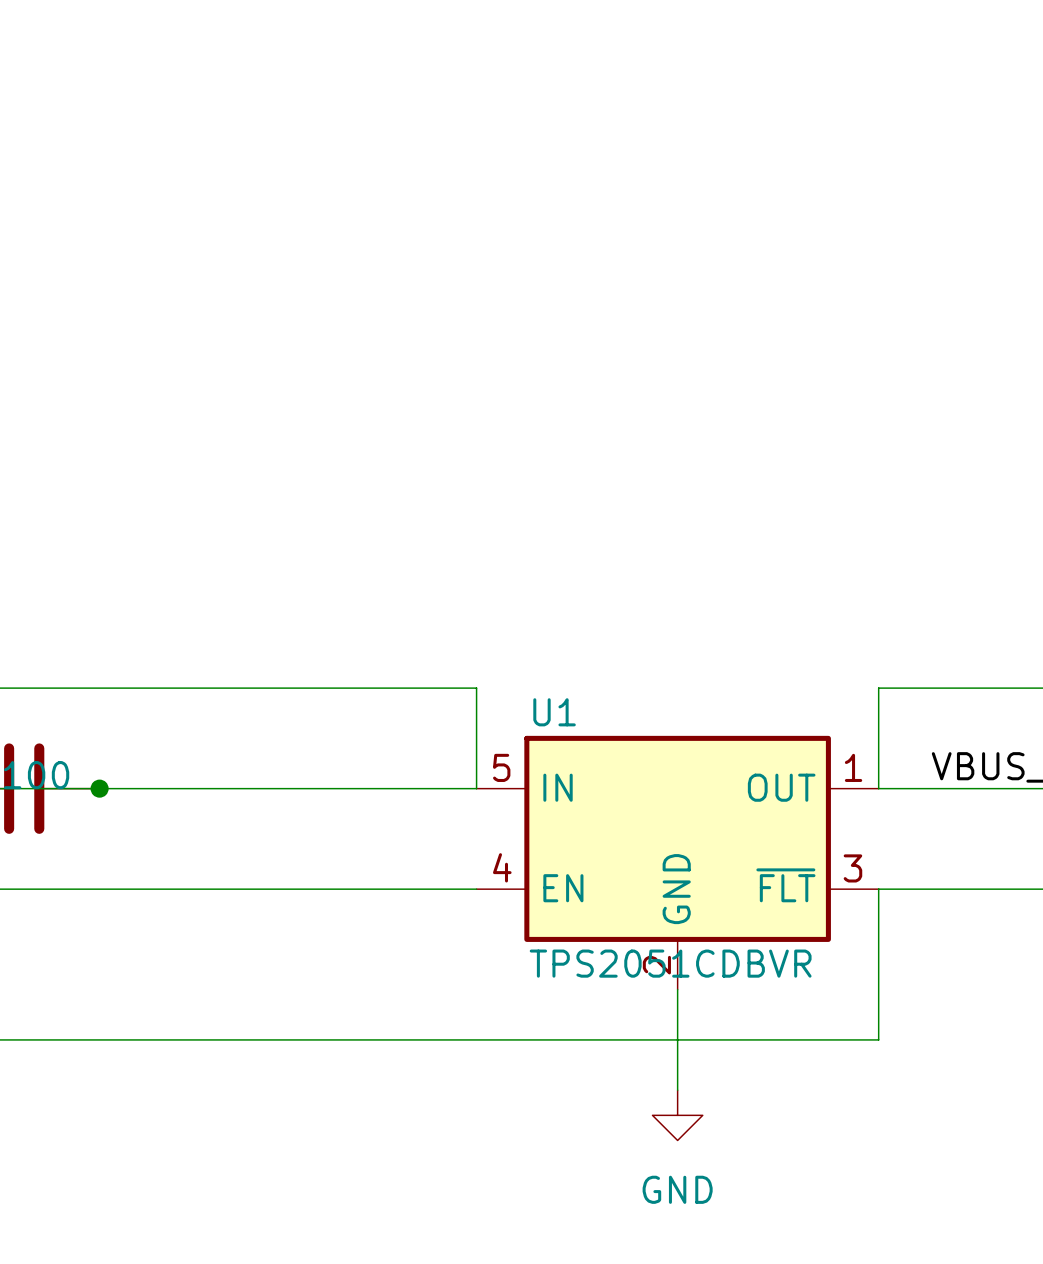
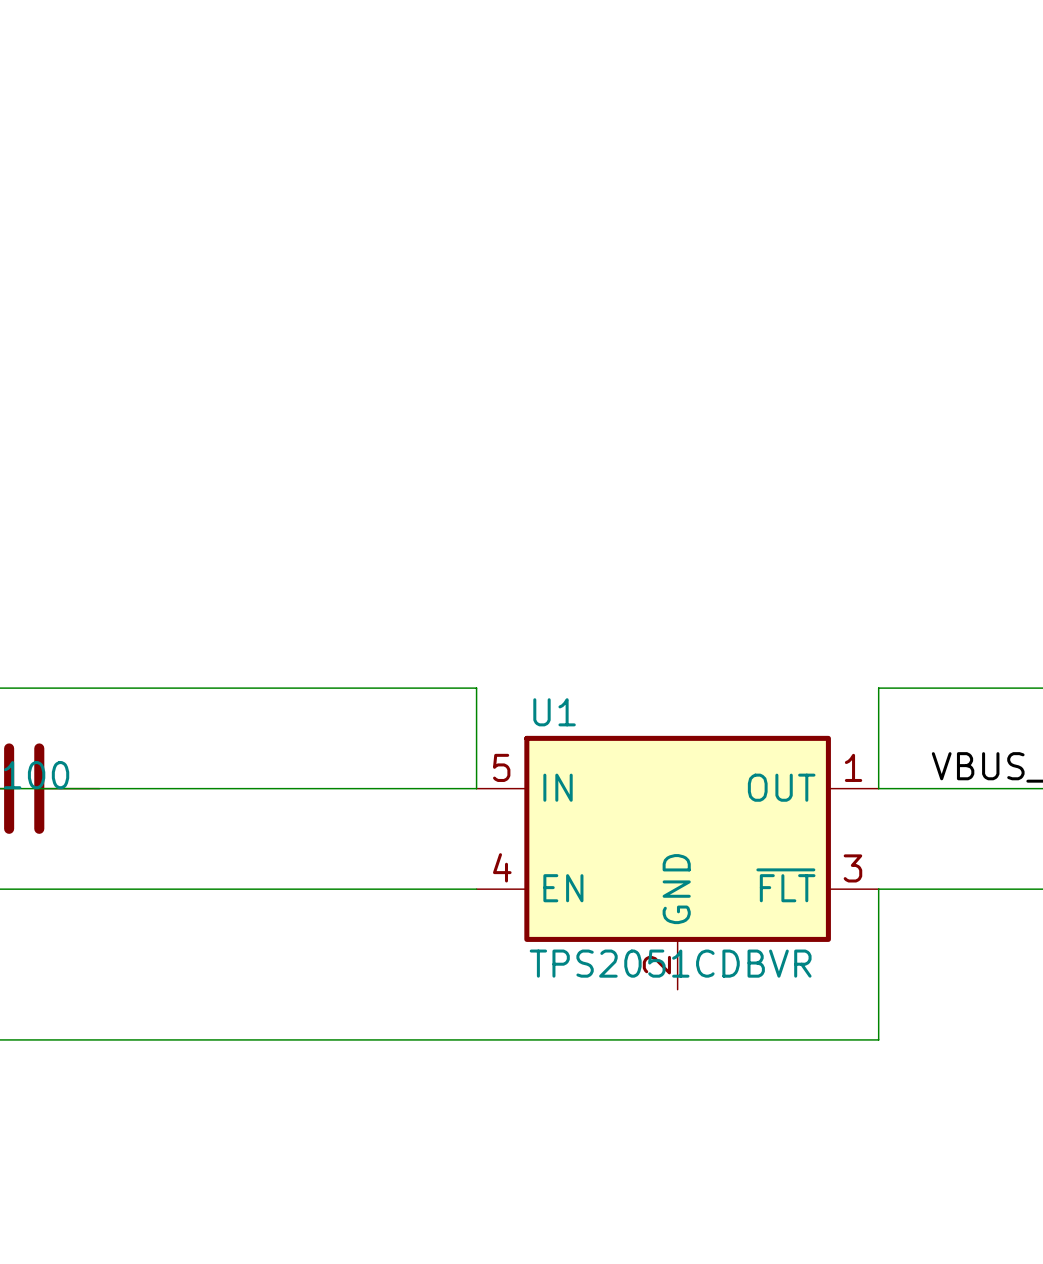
junction: (99, 788) -> none
wire: (677, 989) (677, 1090) -> none
power symbol: GND (677, 1115) -> none

